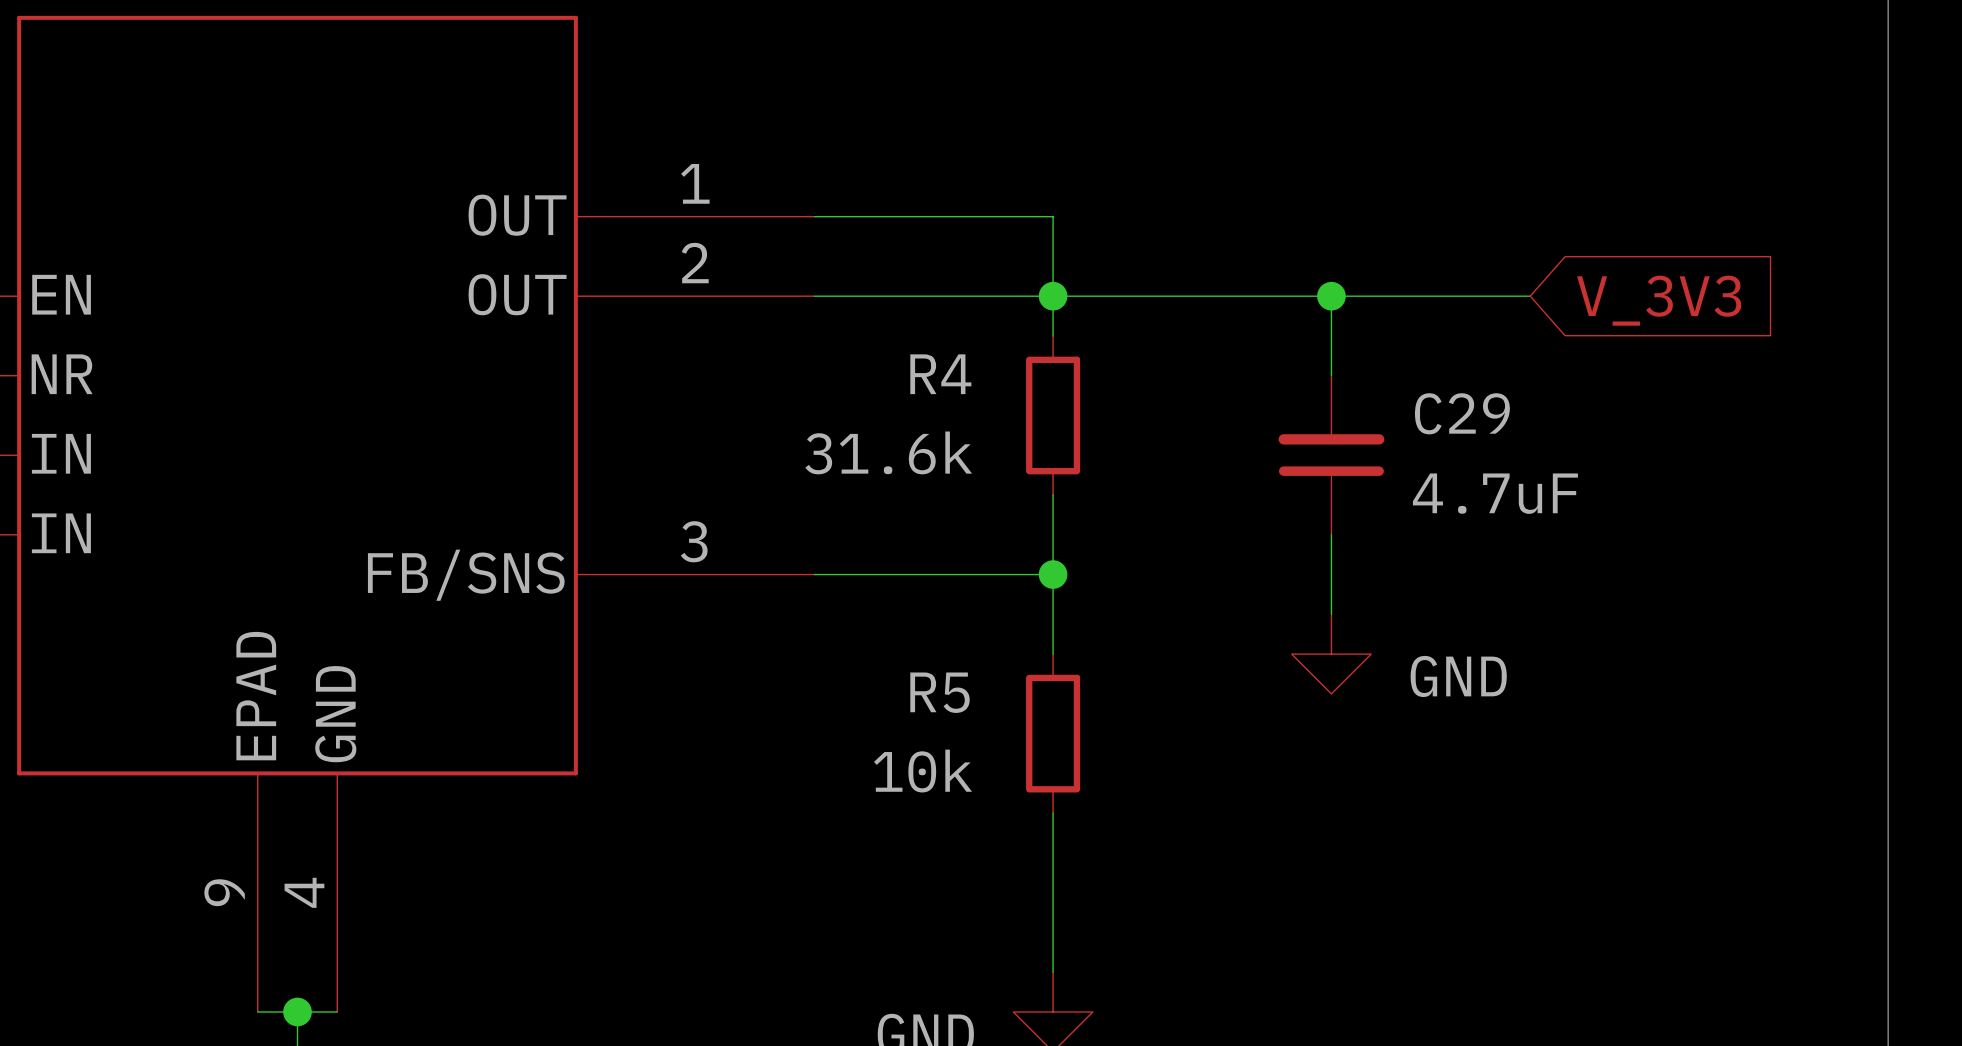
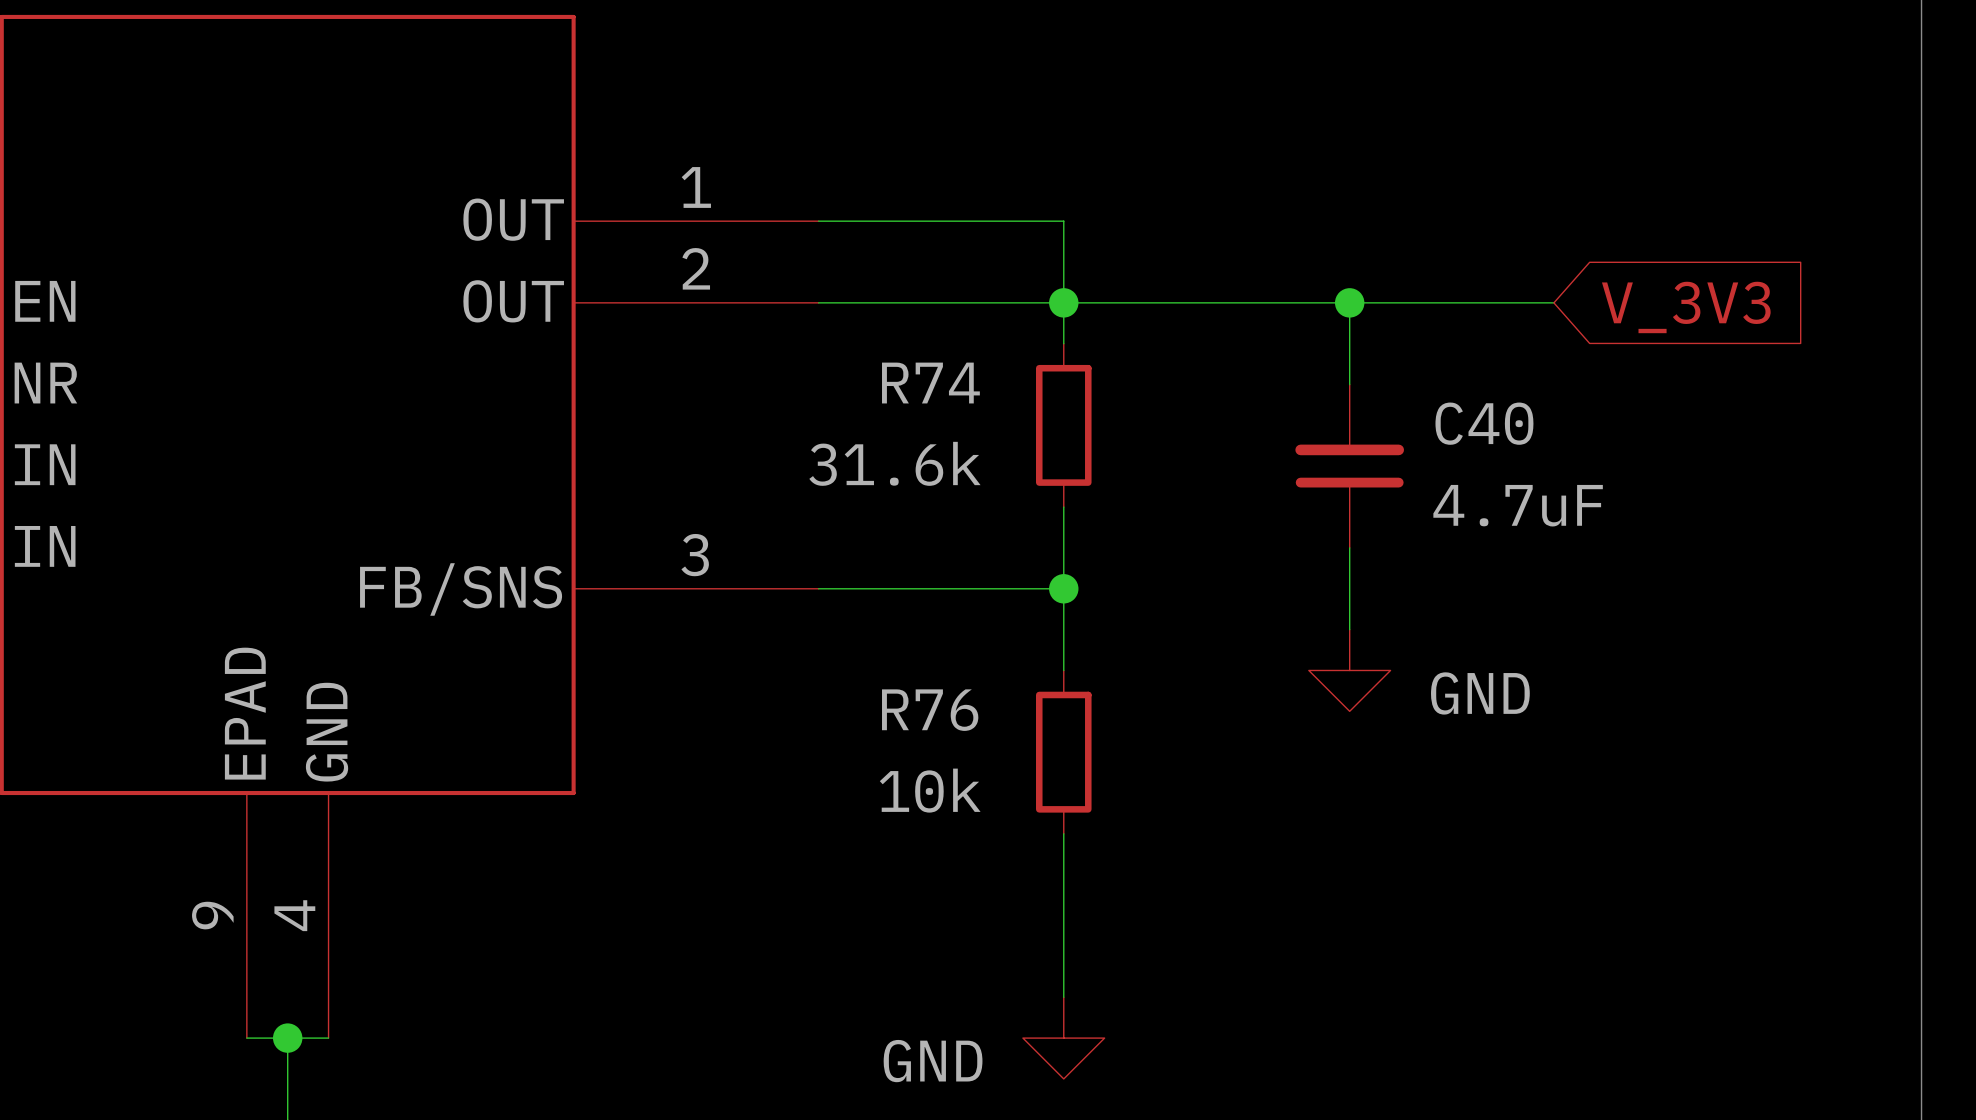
R4 name: R4 (940, 374) -> R74 (930, 383)
C29 name: C29 (1462, 413) -> C40 (1484, 423)
R5 name: R5 (940, 692) -> R76 (930, 710)

